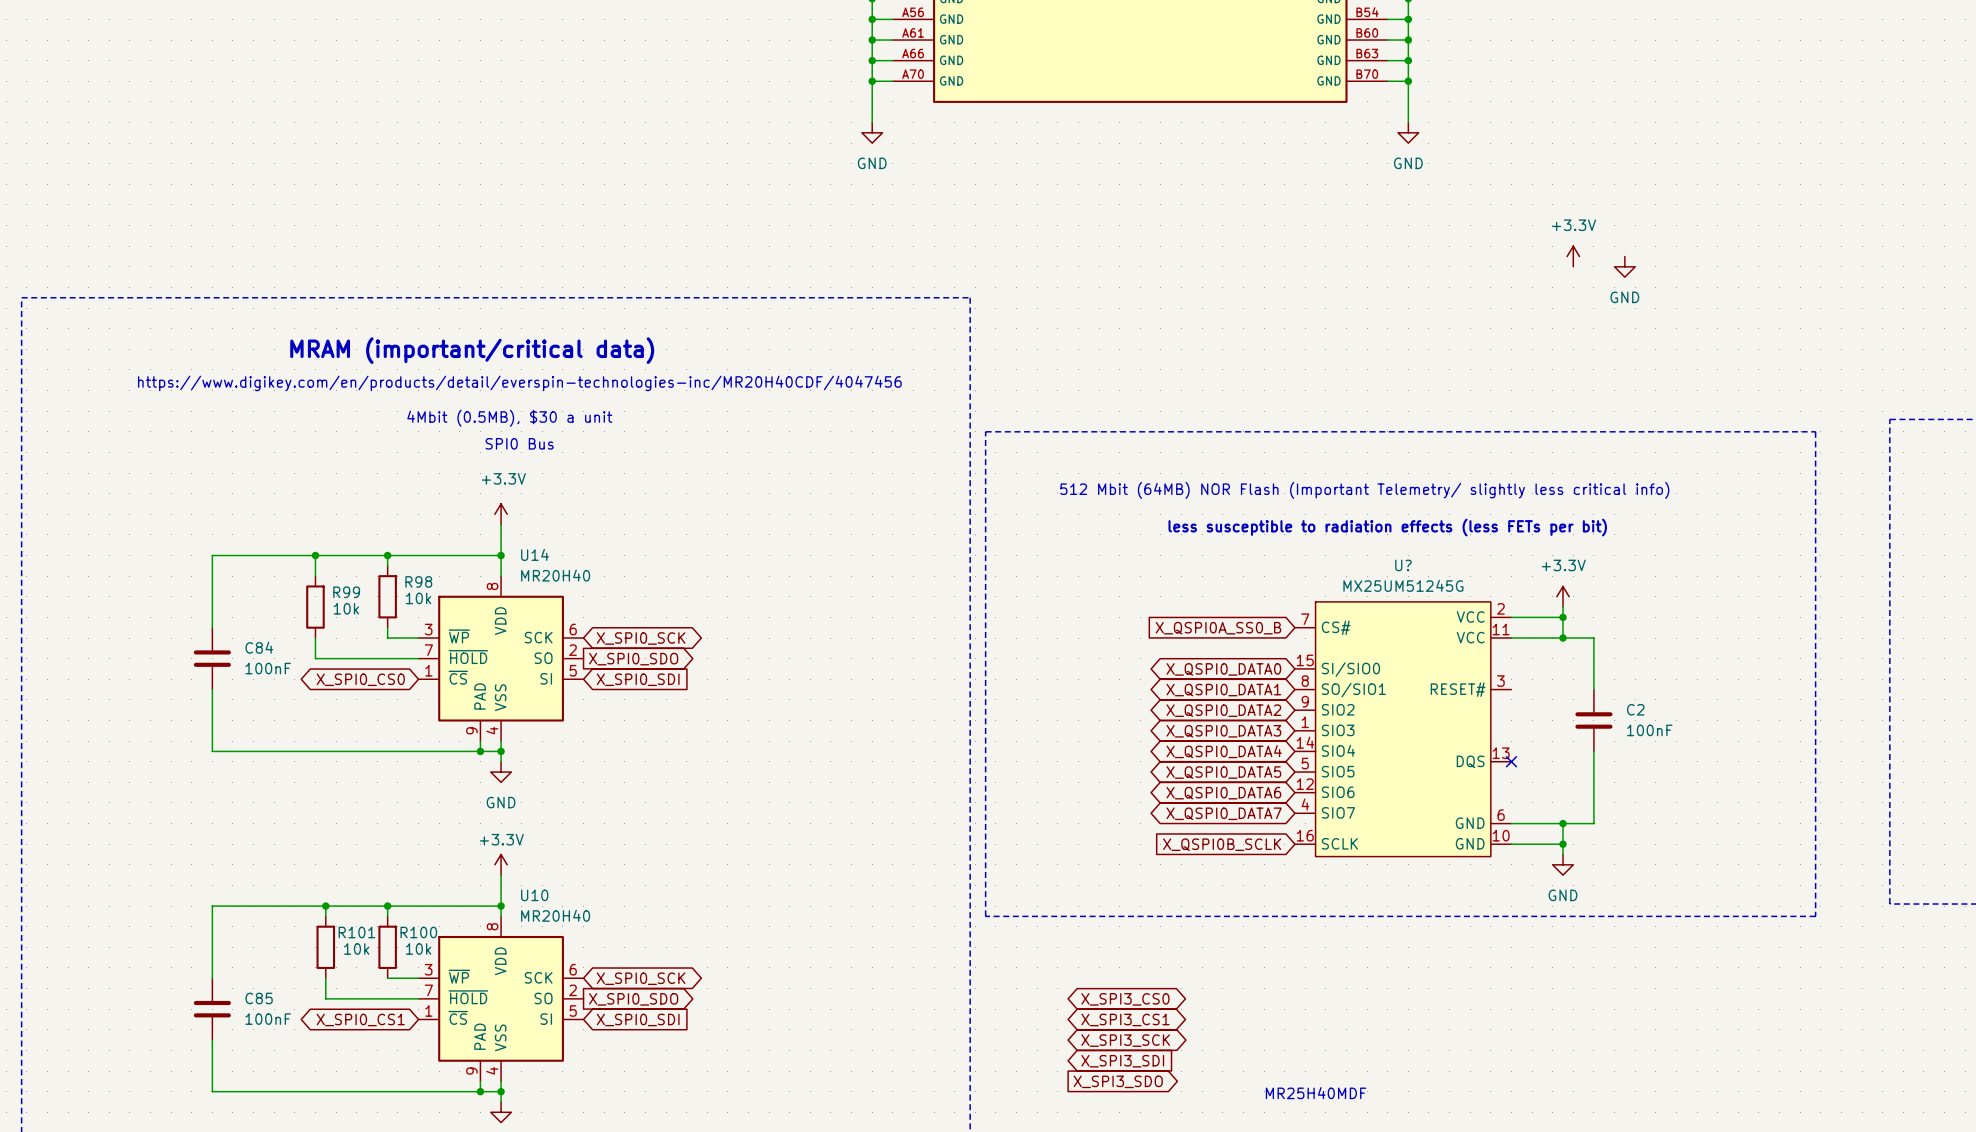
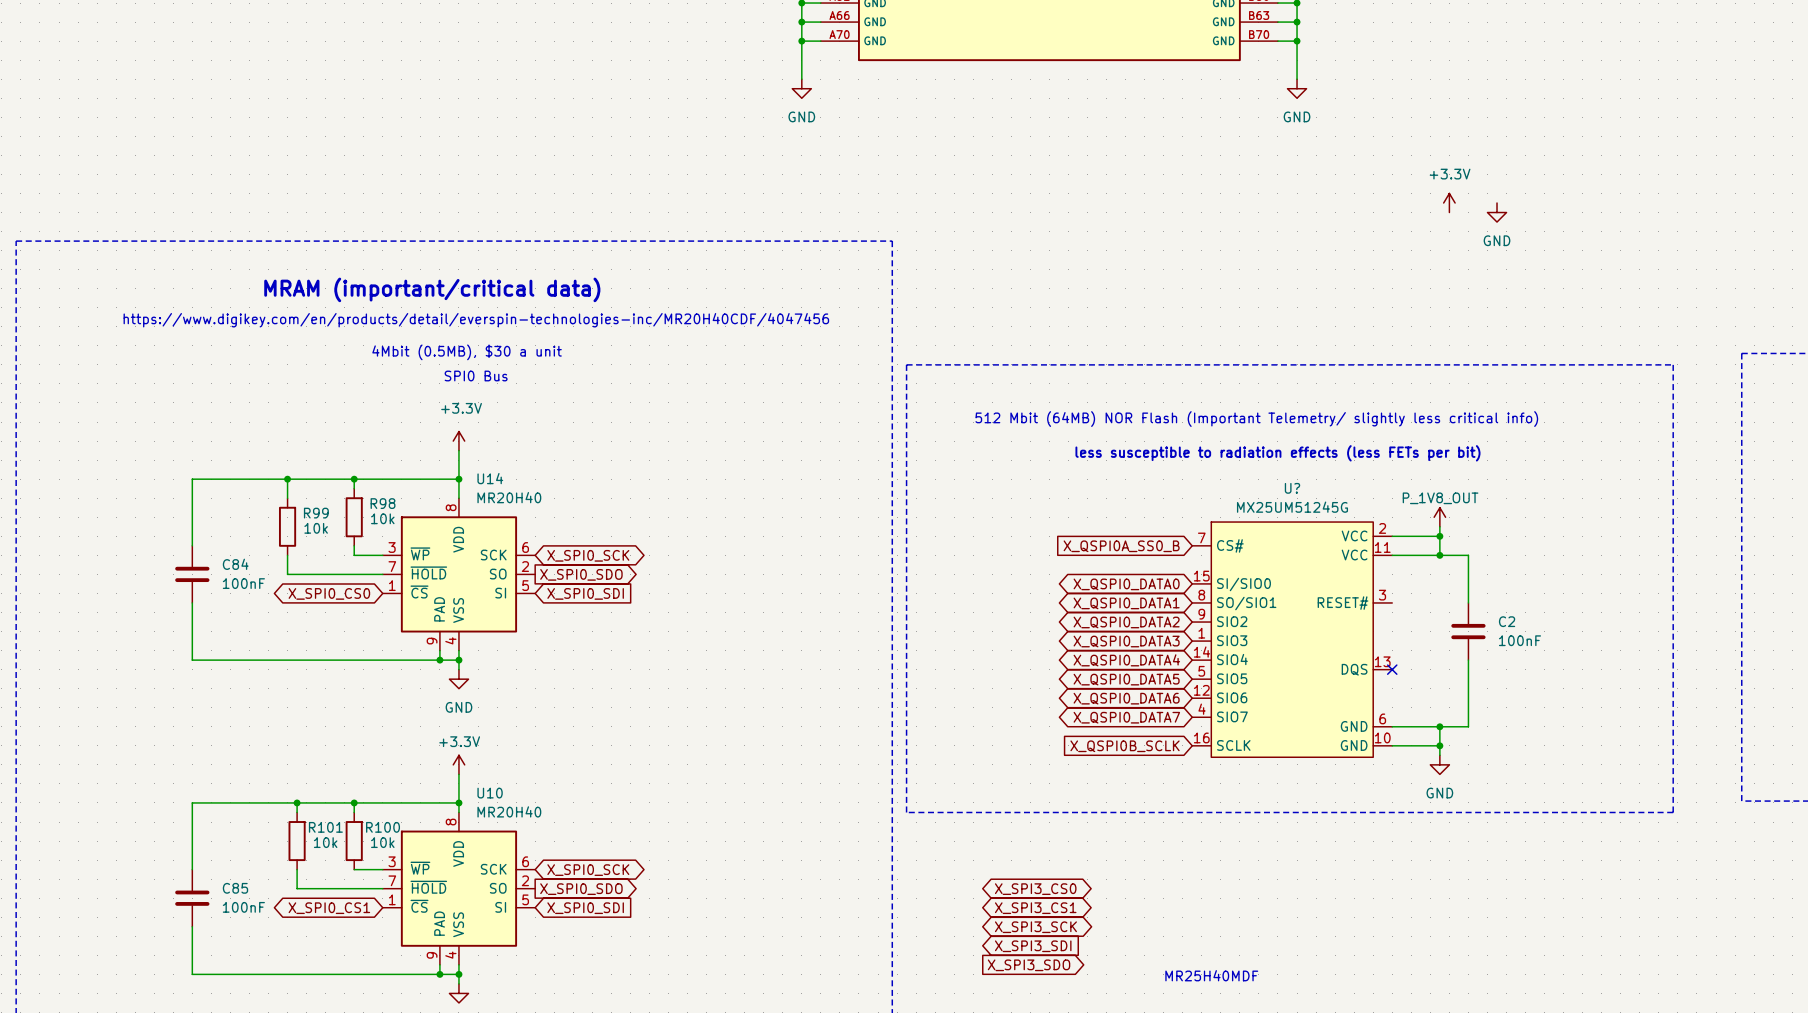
power symbol: +3.3V (1563, 596) -> P_1V8_OUT (1439, 517)

